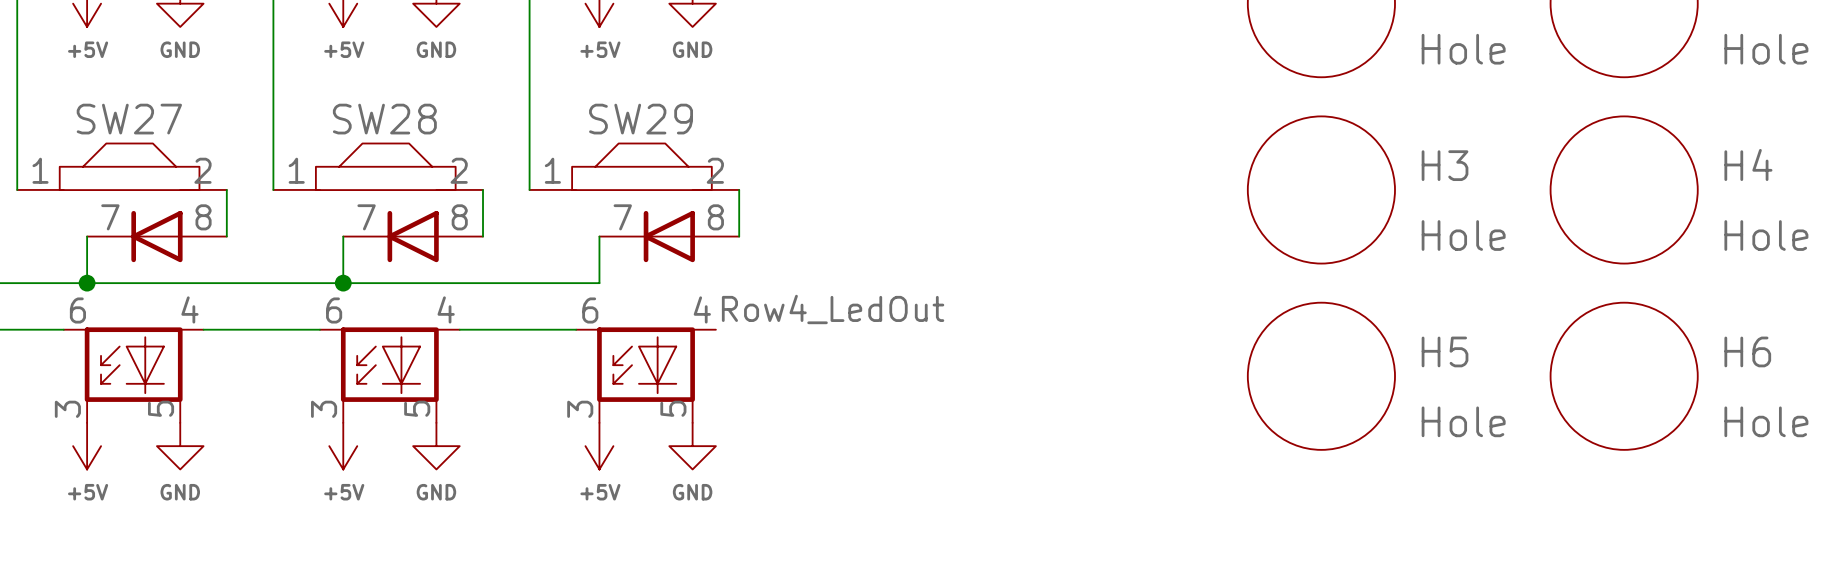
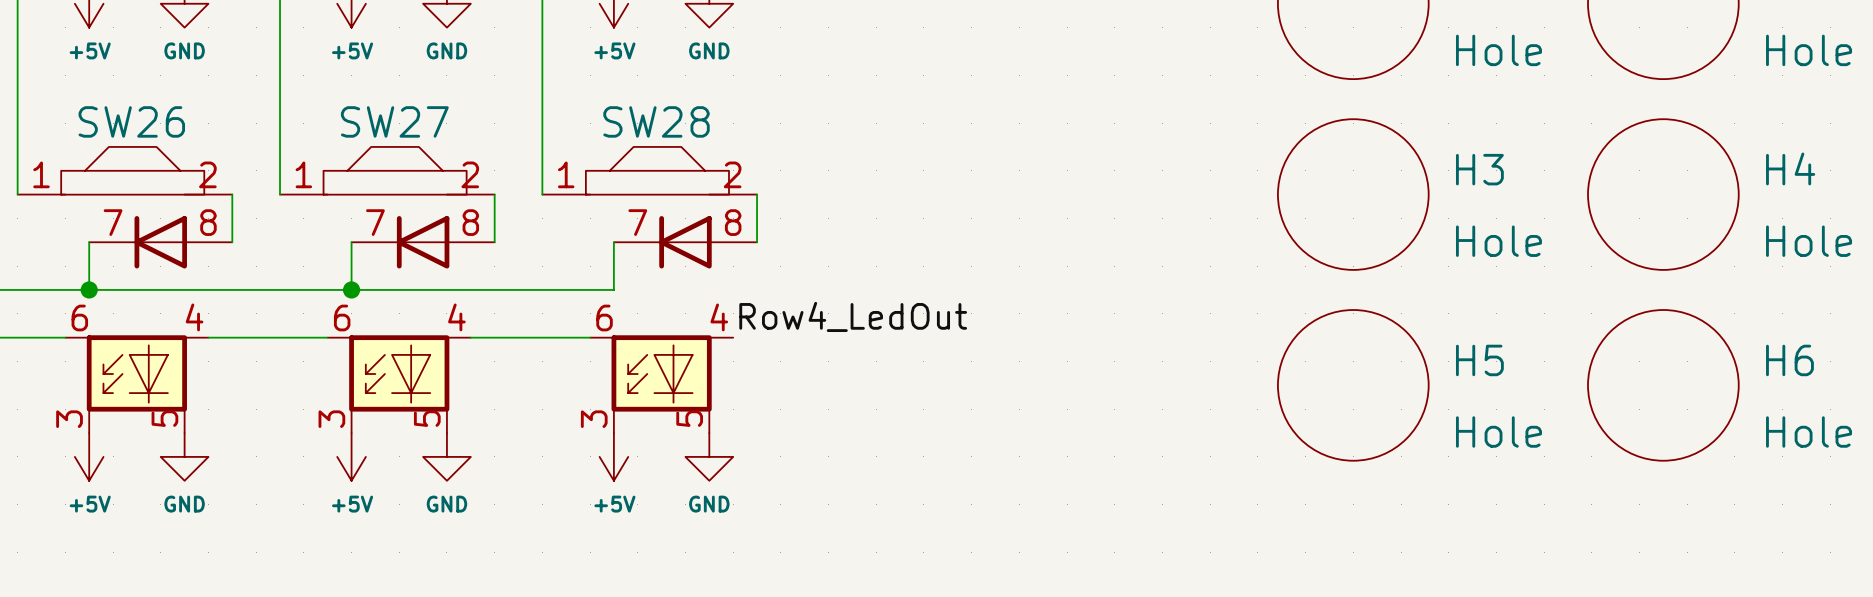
SW27 name: SW27 (129, 119) -> SW26 (131, 121)
SW28 name: SW28 (384, 119) -> SW27 (394, 121)
SW29 name: SW29 (641, 119) -> SW28 (656, 121)

